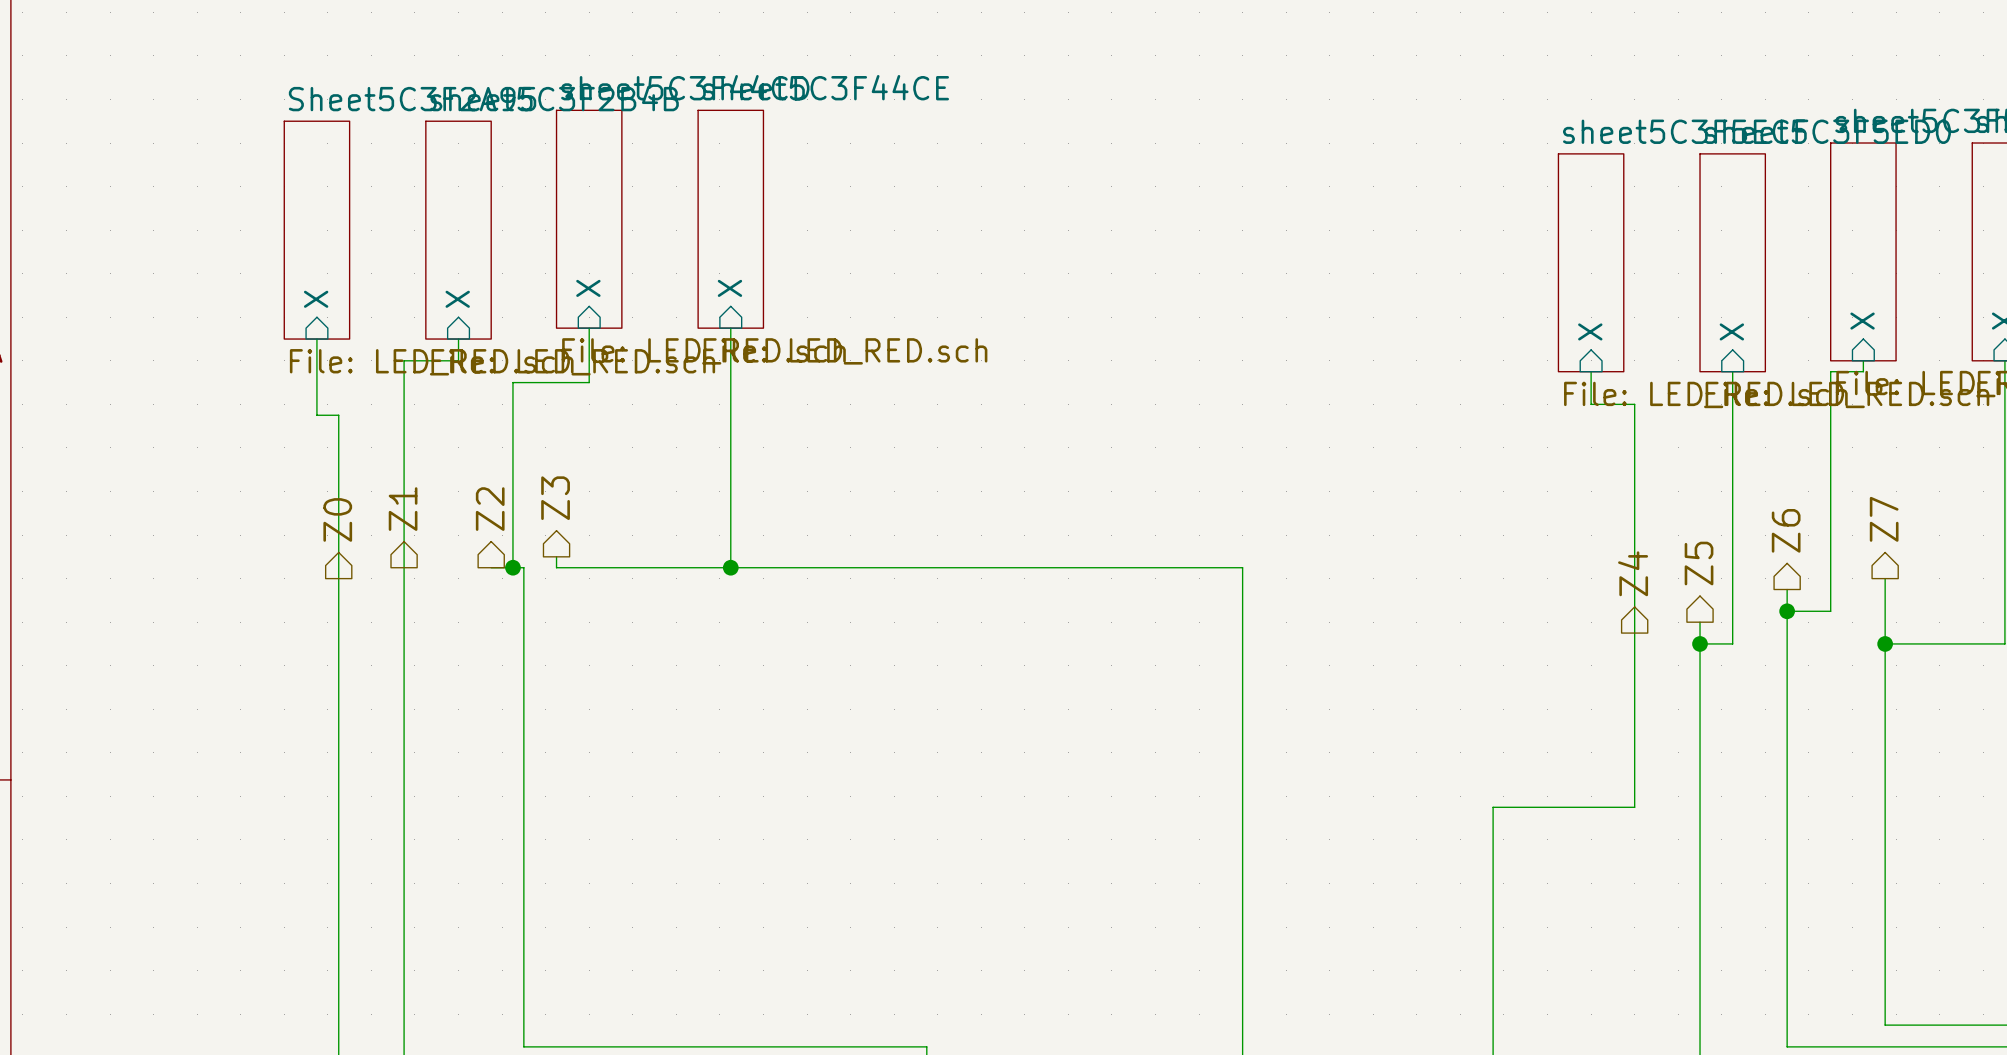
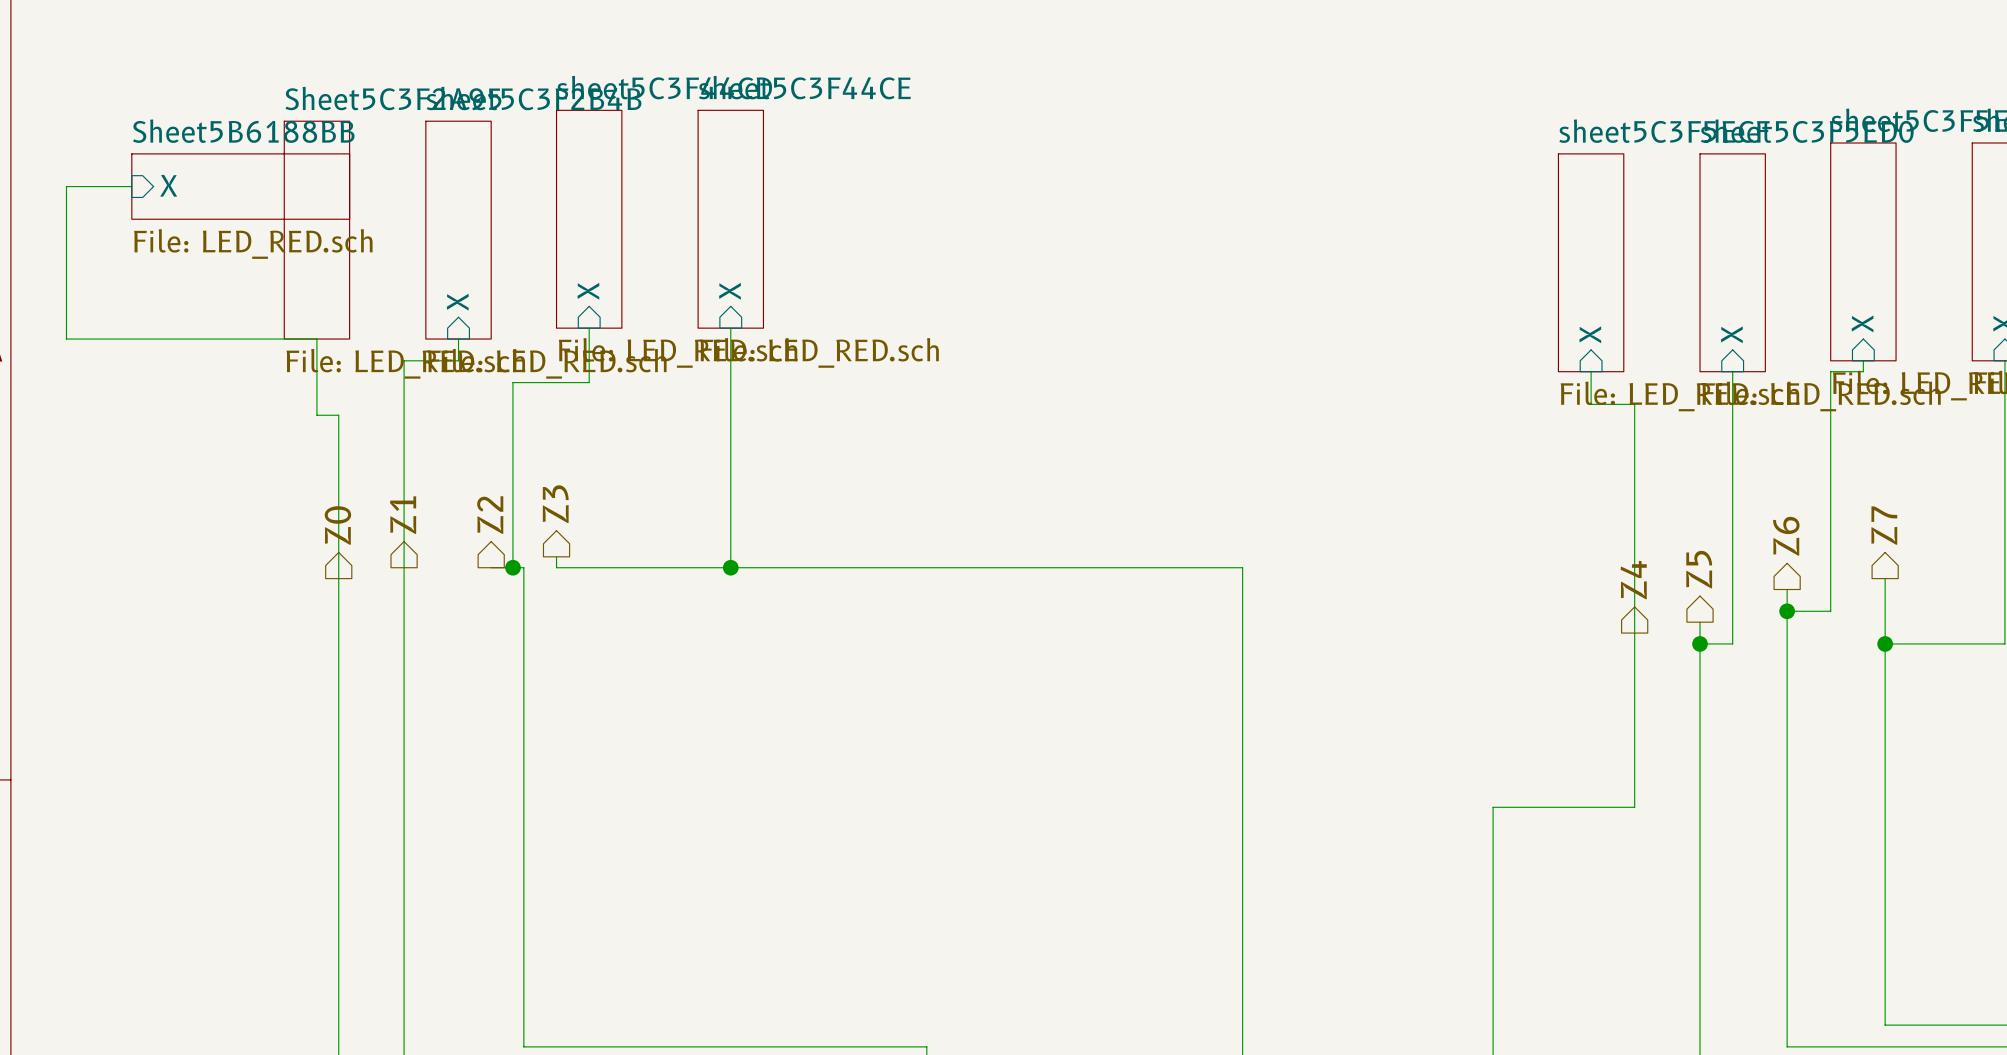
wire: none -> (131, 186) (66, 186) (66, 339) (316, 339)
sheet Sheet5B6188BB: none -> File: LED_RED.sch (240, 186)
sheet pin rotation: 0° (316, 299) -> 90° clockwise (168, 185)
sheet pin position: X (316, 299) -> X (168, 185)

